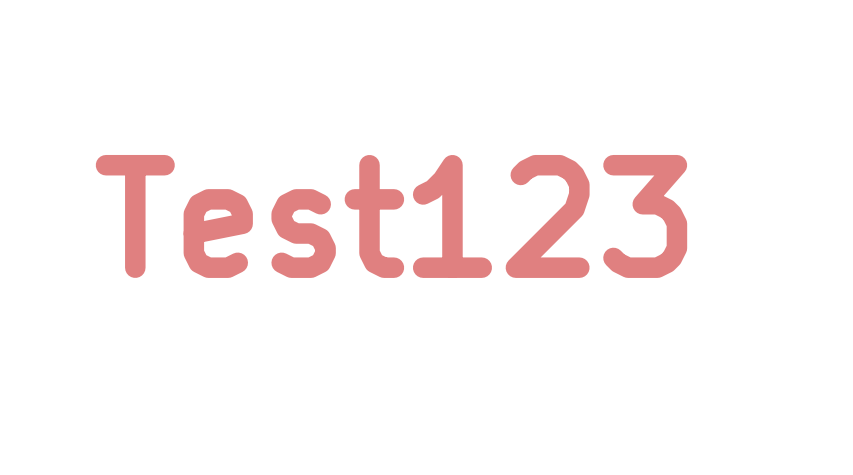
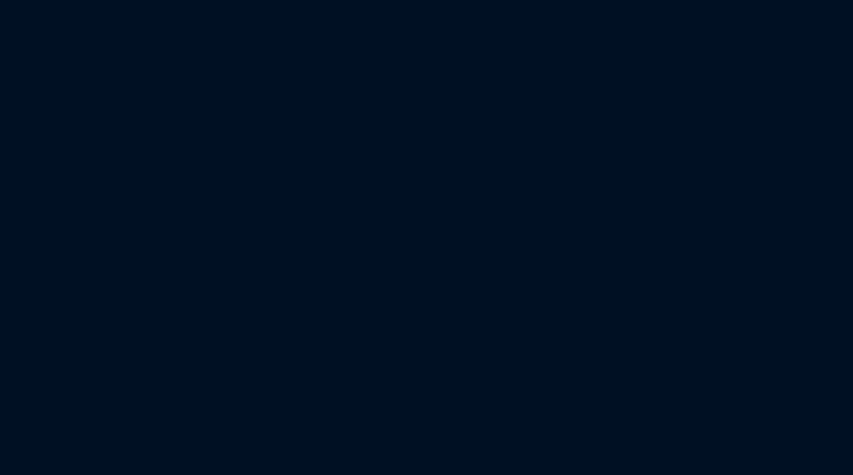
text: Test123 (391, 216) -> none

